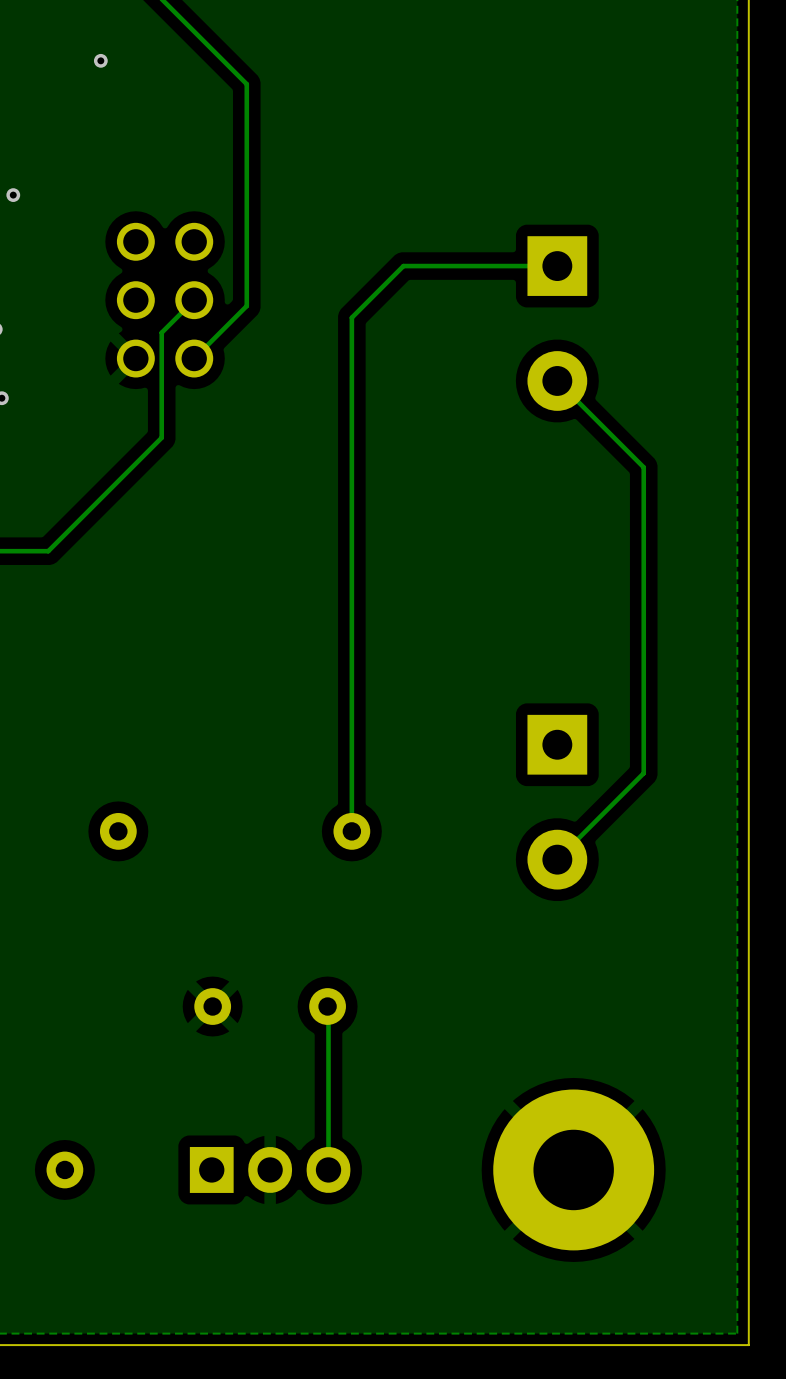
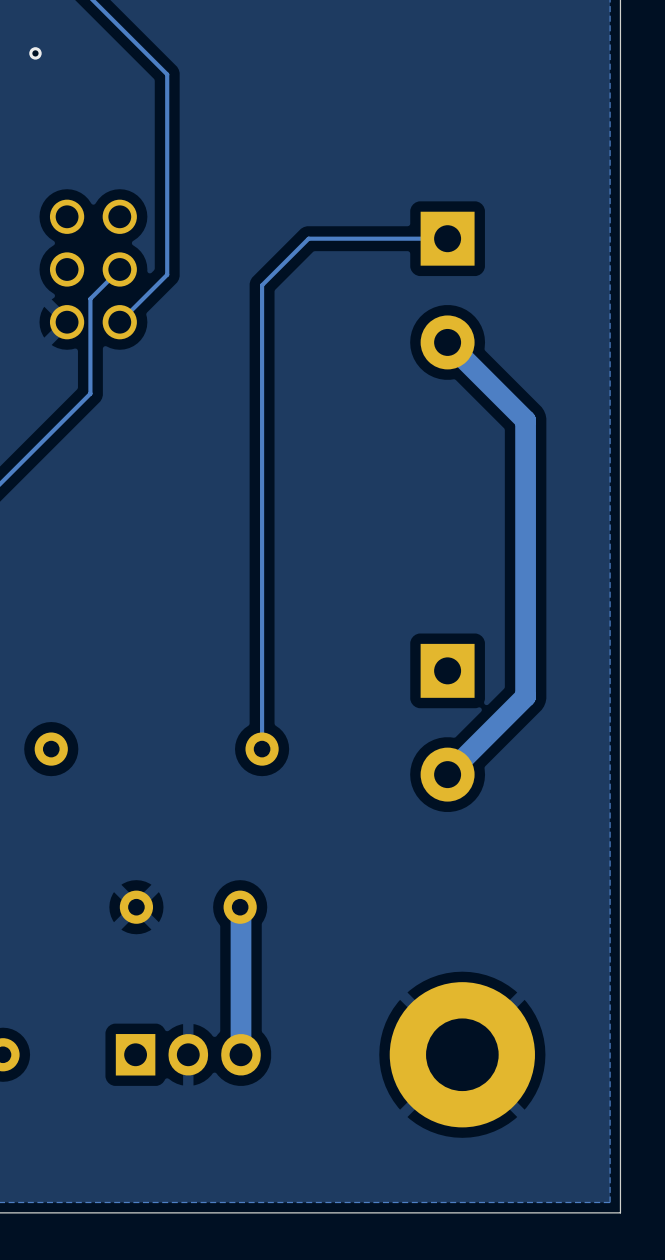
track width: thin (557, 380) (643, 467) (643, 773) (557, 859) -> thick (447, 342) (525, 420) (525, 696) (447, 774)
track width: thin (327, 1006) (328, 1169) -> thick (240, 907) (241, 1054)

